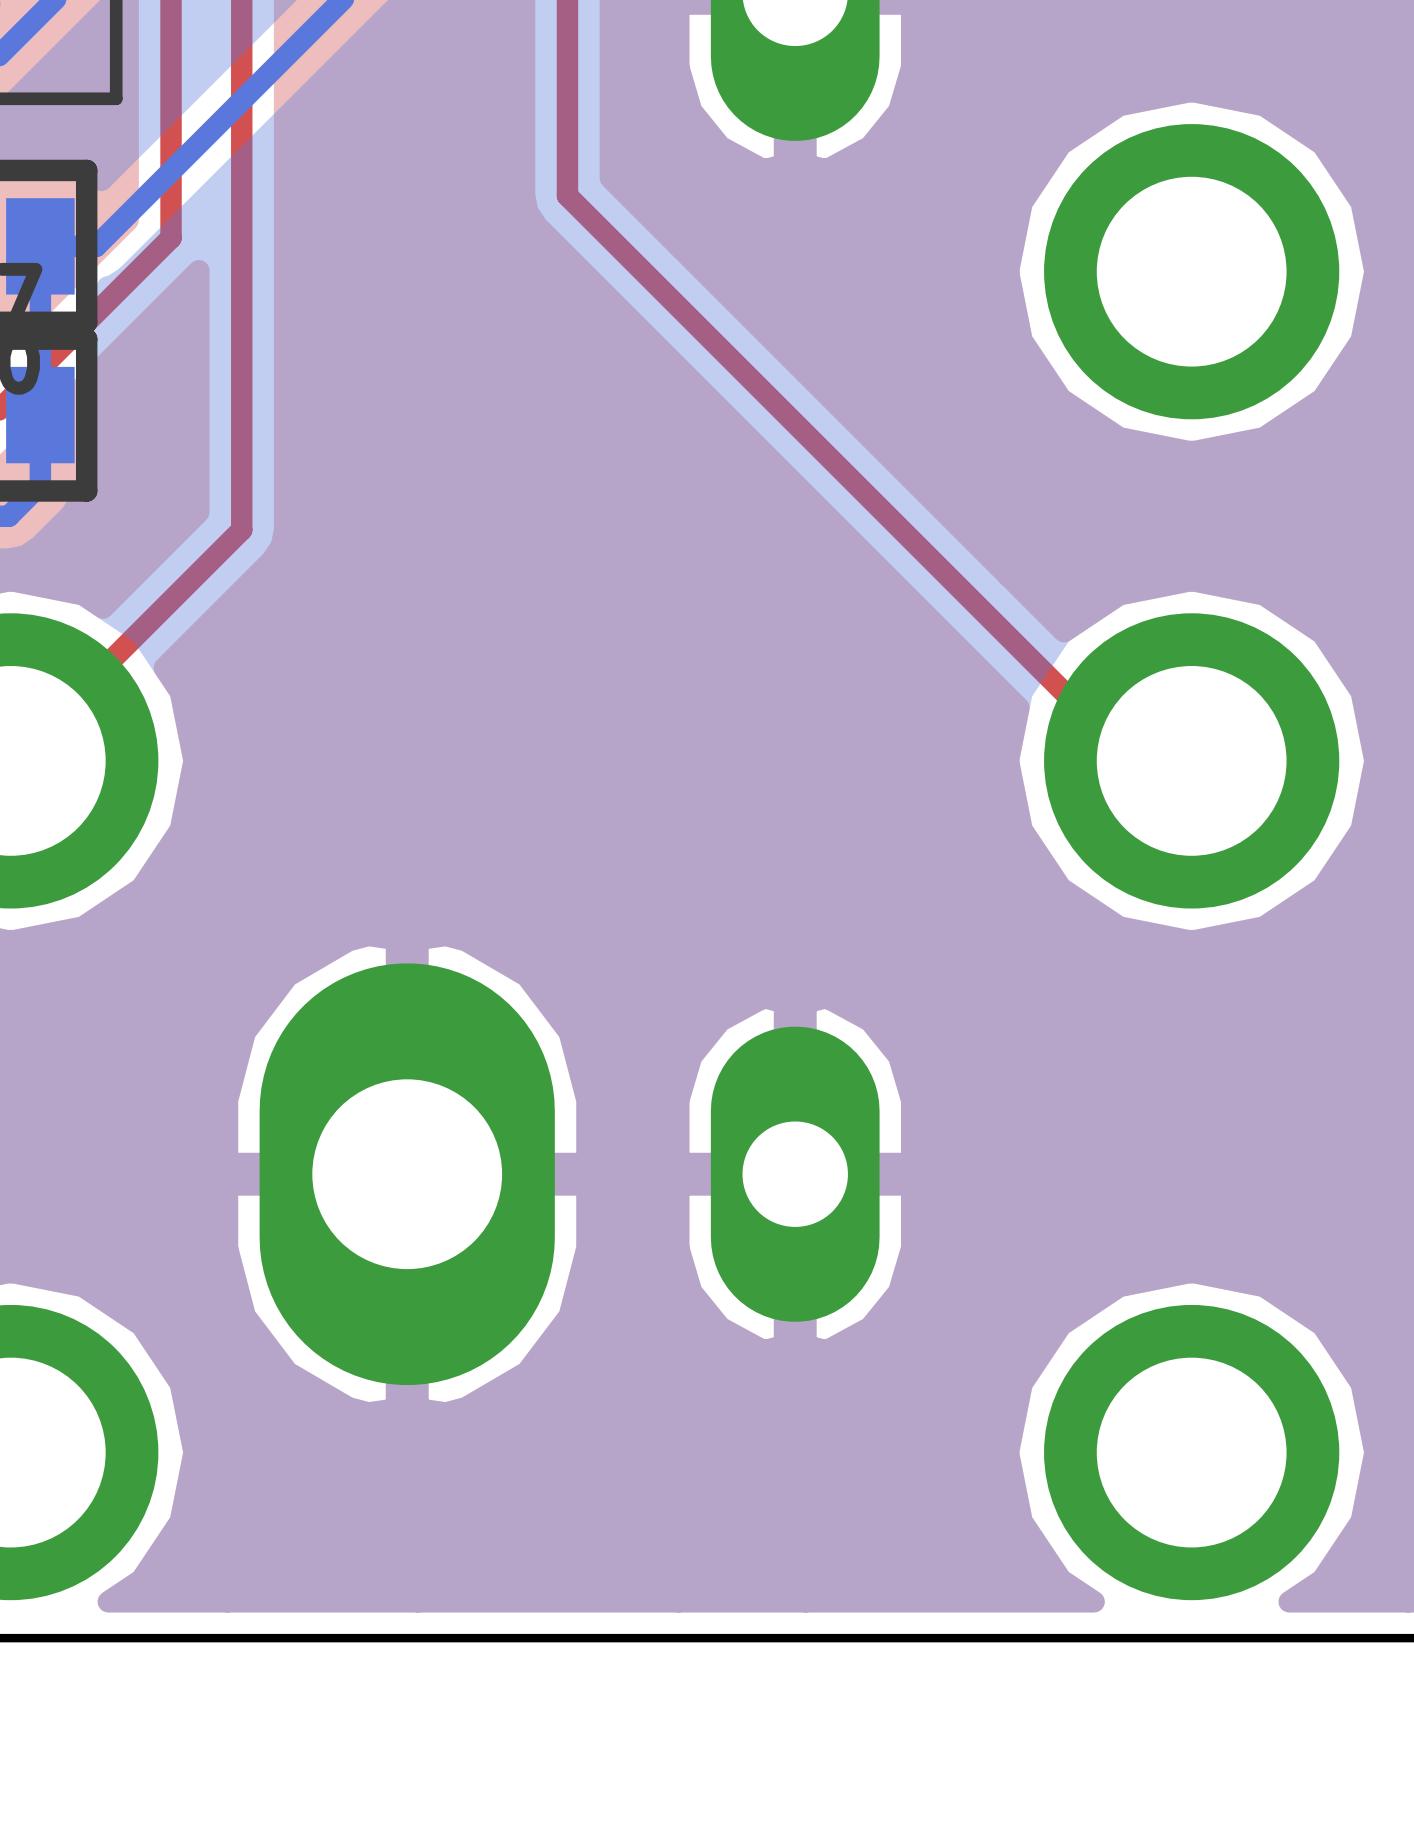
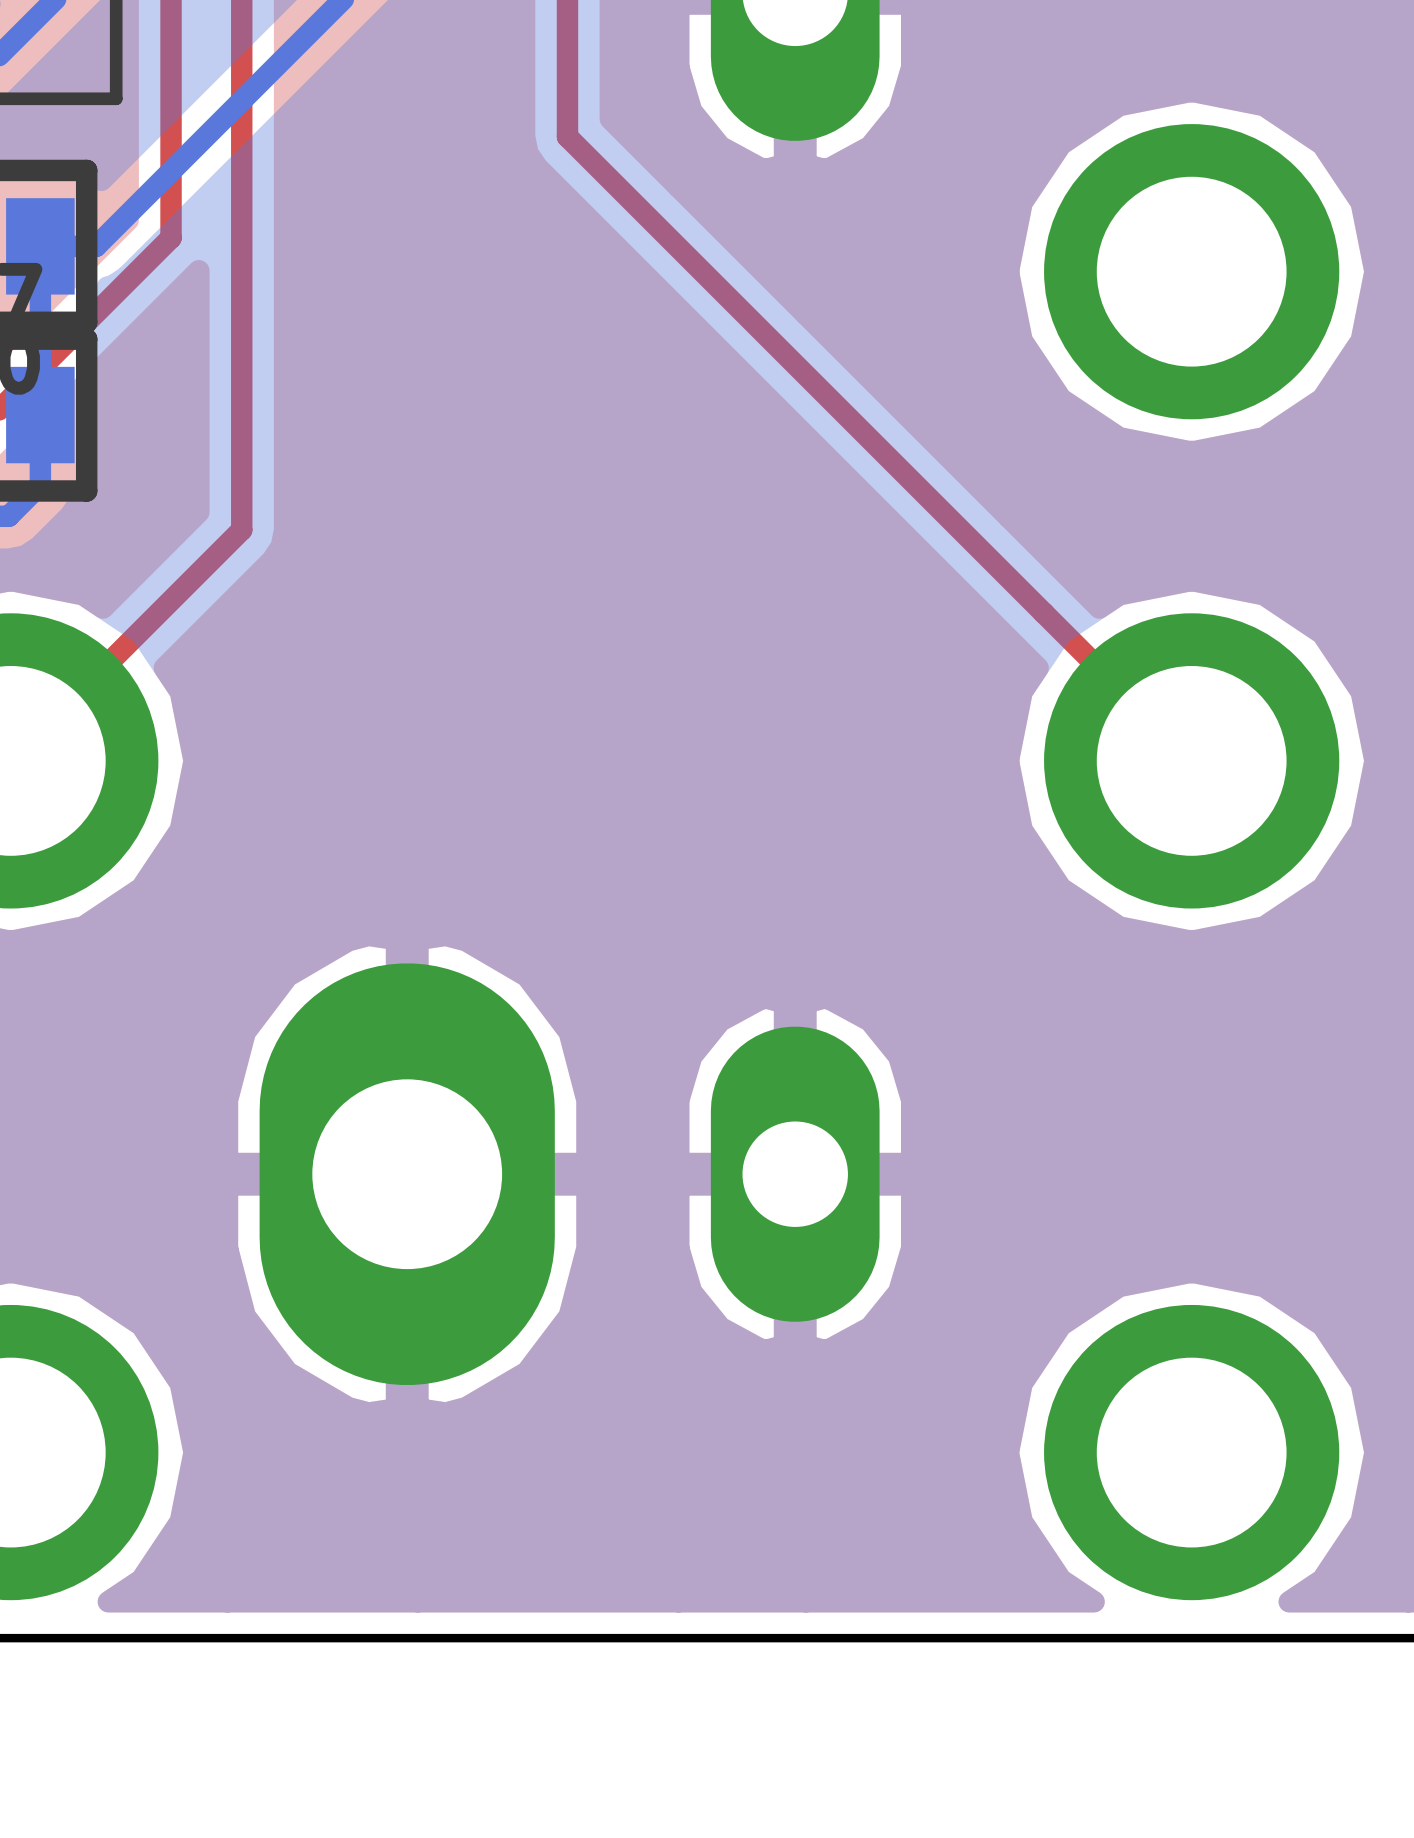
top track: (567, 136) (567, 195) (1132, 760) (1191, 760) -> (567, 136) (1191, 760)

